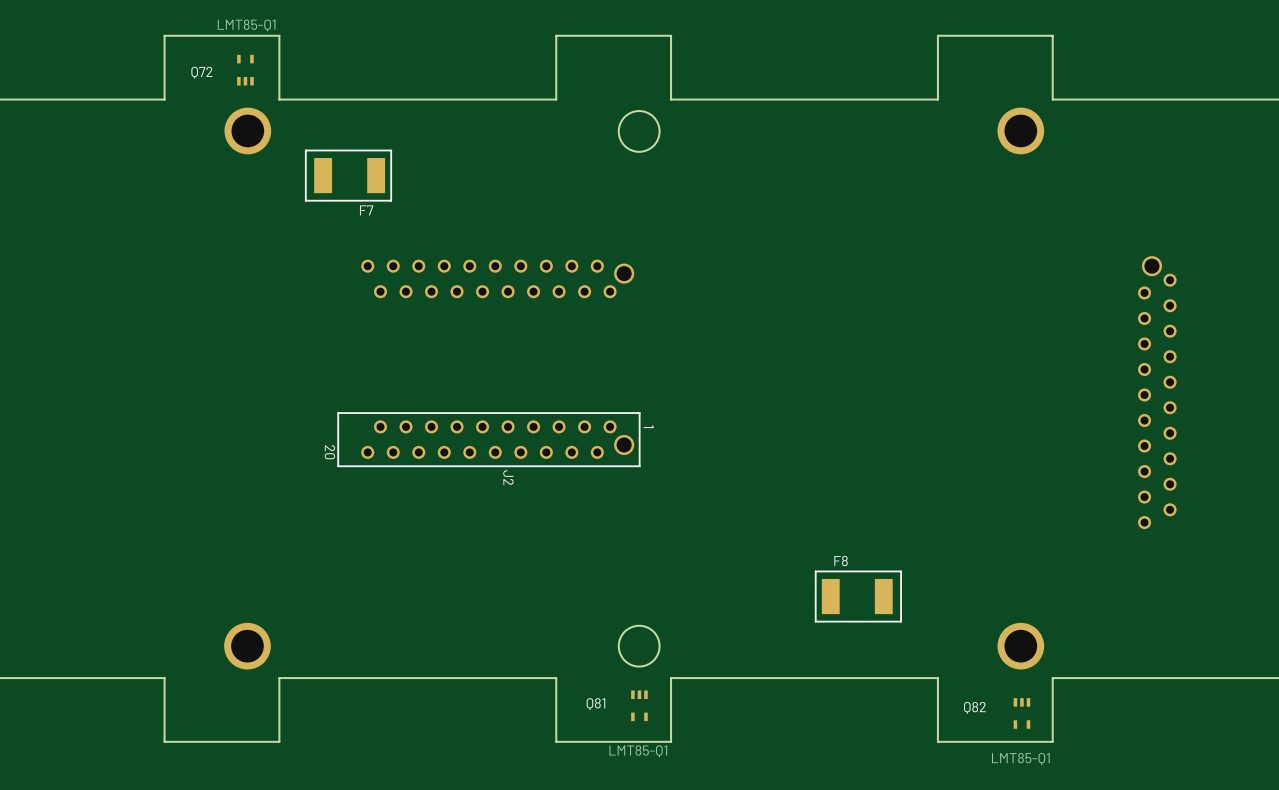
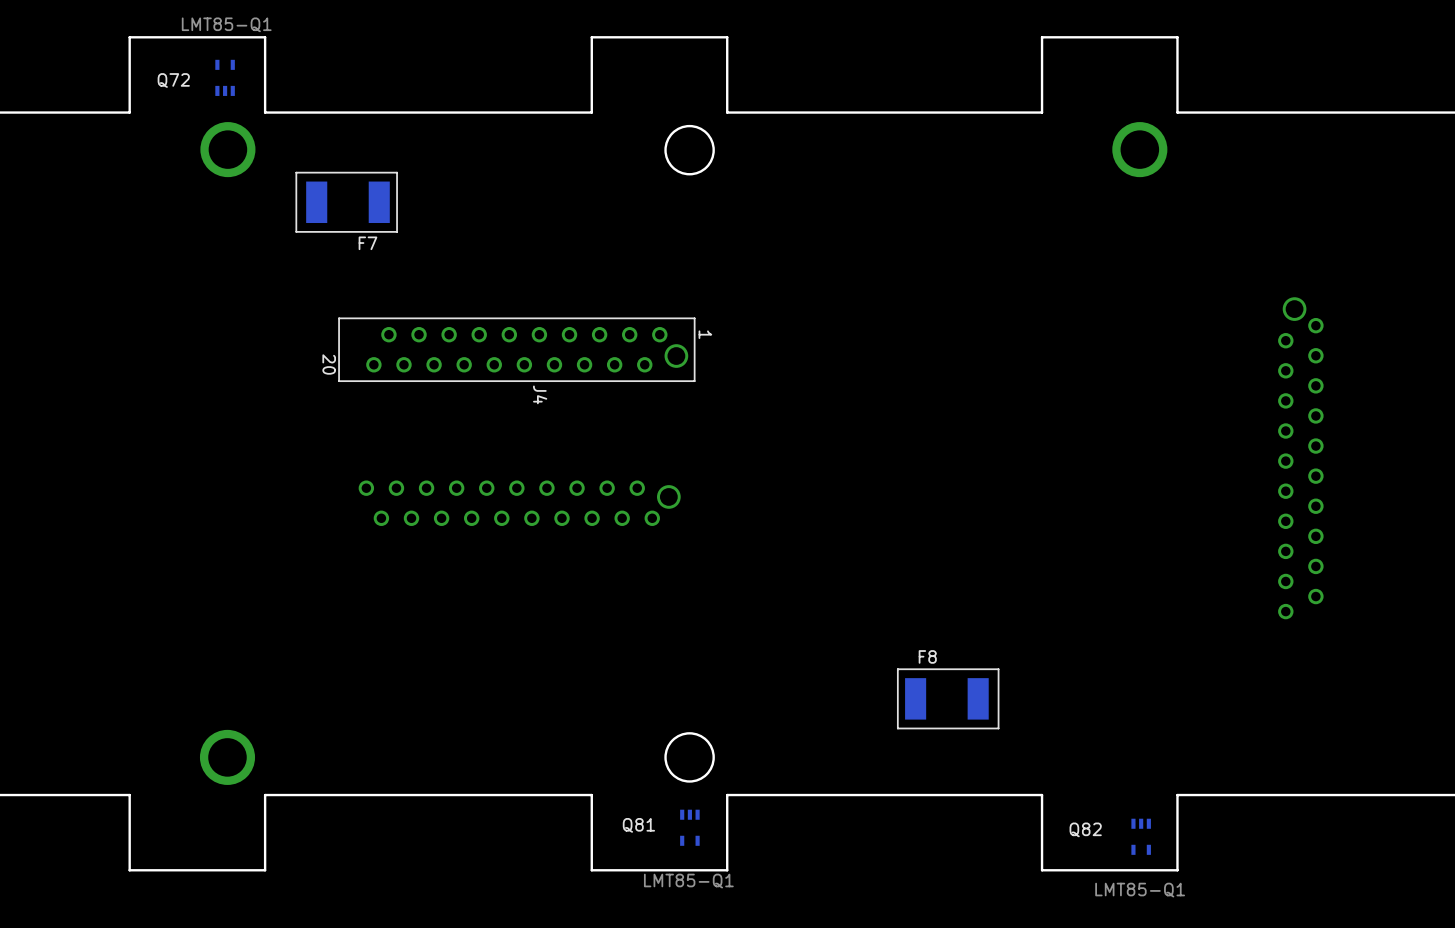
J4 side: top (497, 278) -> bottom (516, 349)
J2 side: bottom (488, 439) -> top (519, 503)
part: (1020, 646) -> none

